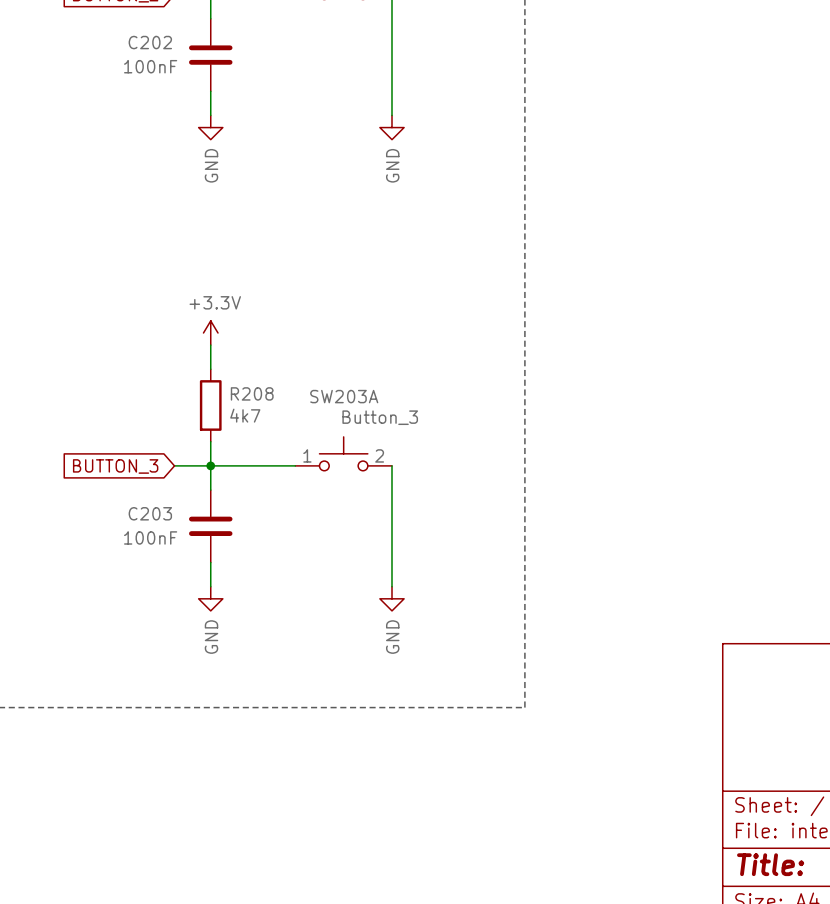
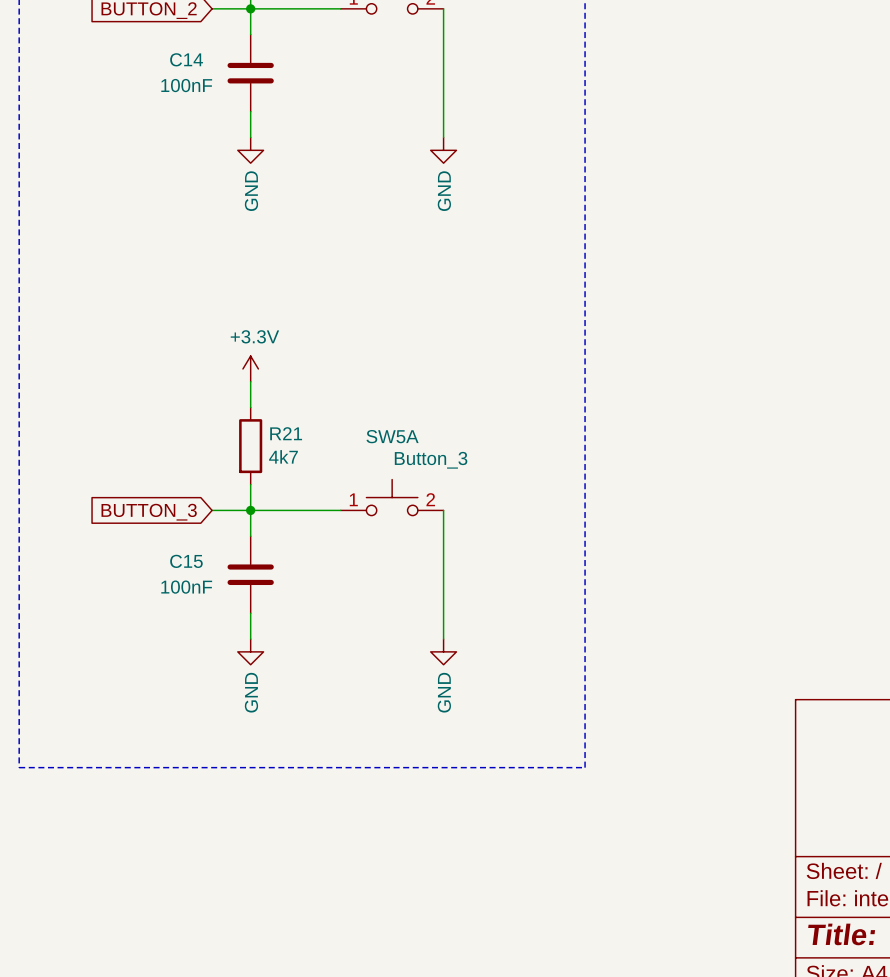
C202 name: C202 (150, 42) -> C14 (186, 59)
R208 name: R208 (252, 393) -> R21 (286, 433)
SW203A name: SW203A (344, 396) -> SW5A (392, 436)
C203 name: C203 (150, 513) -> C15 (186, 561)

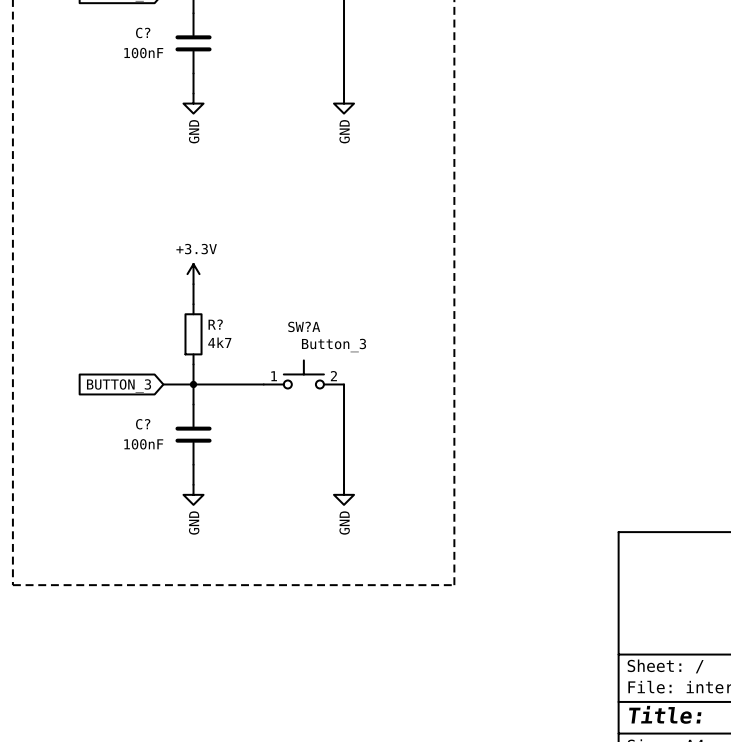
C14 name: C14 (186, 59) -> C? (143, 32)
R21 name: R21 (286, 433) -> R? (215, 324)
SW5A name: SW5A (392, 436) -> SW?A (304, 326)
C15 name: C15 (186, 561) -> C? (143, 424)

